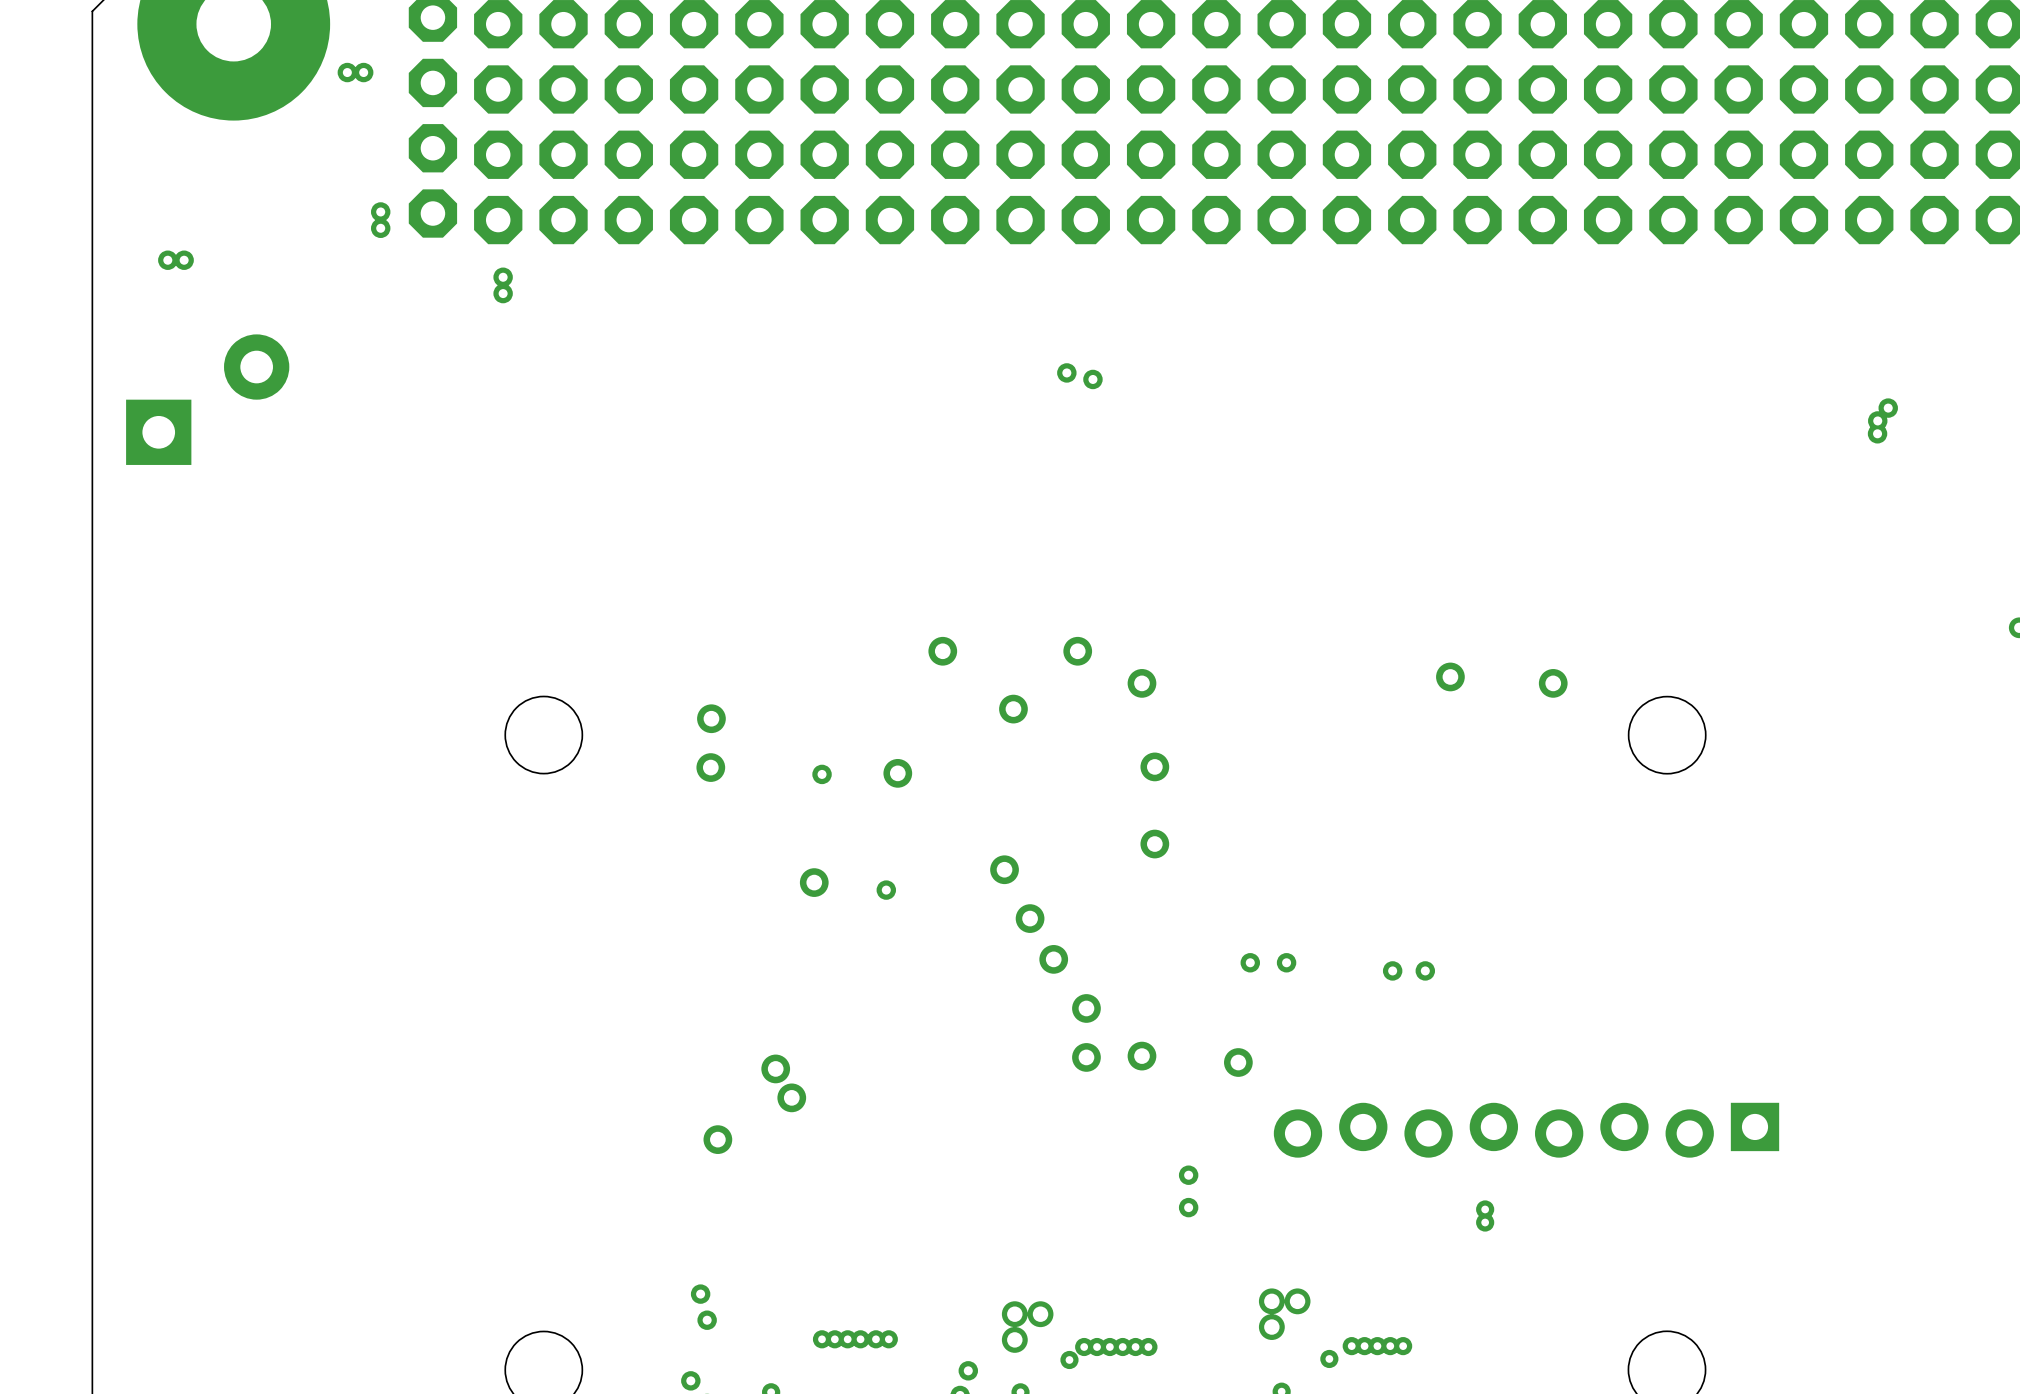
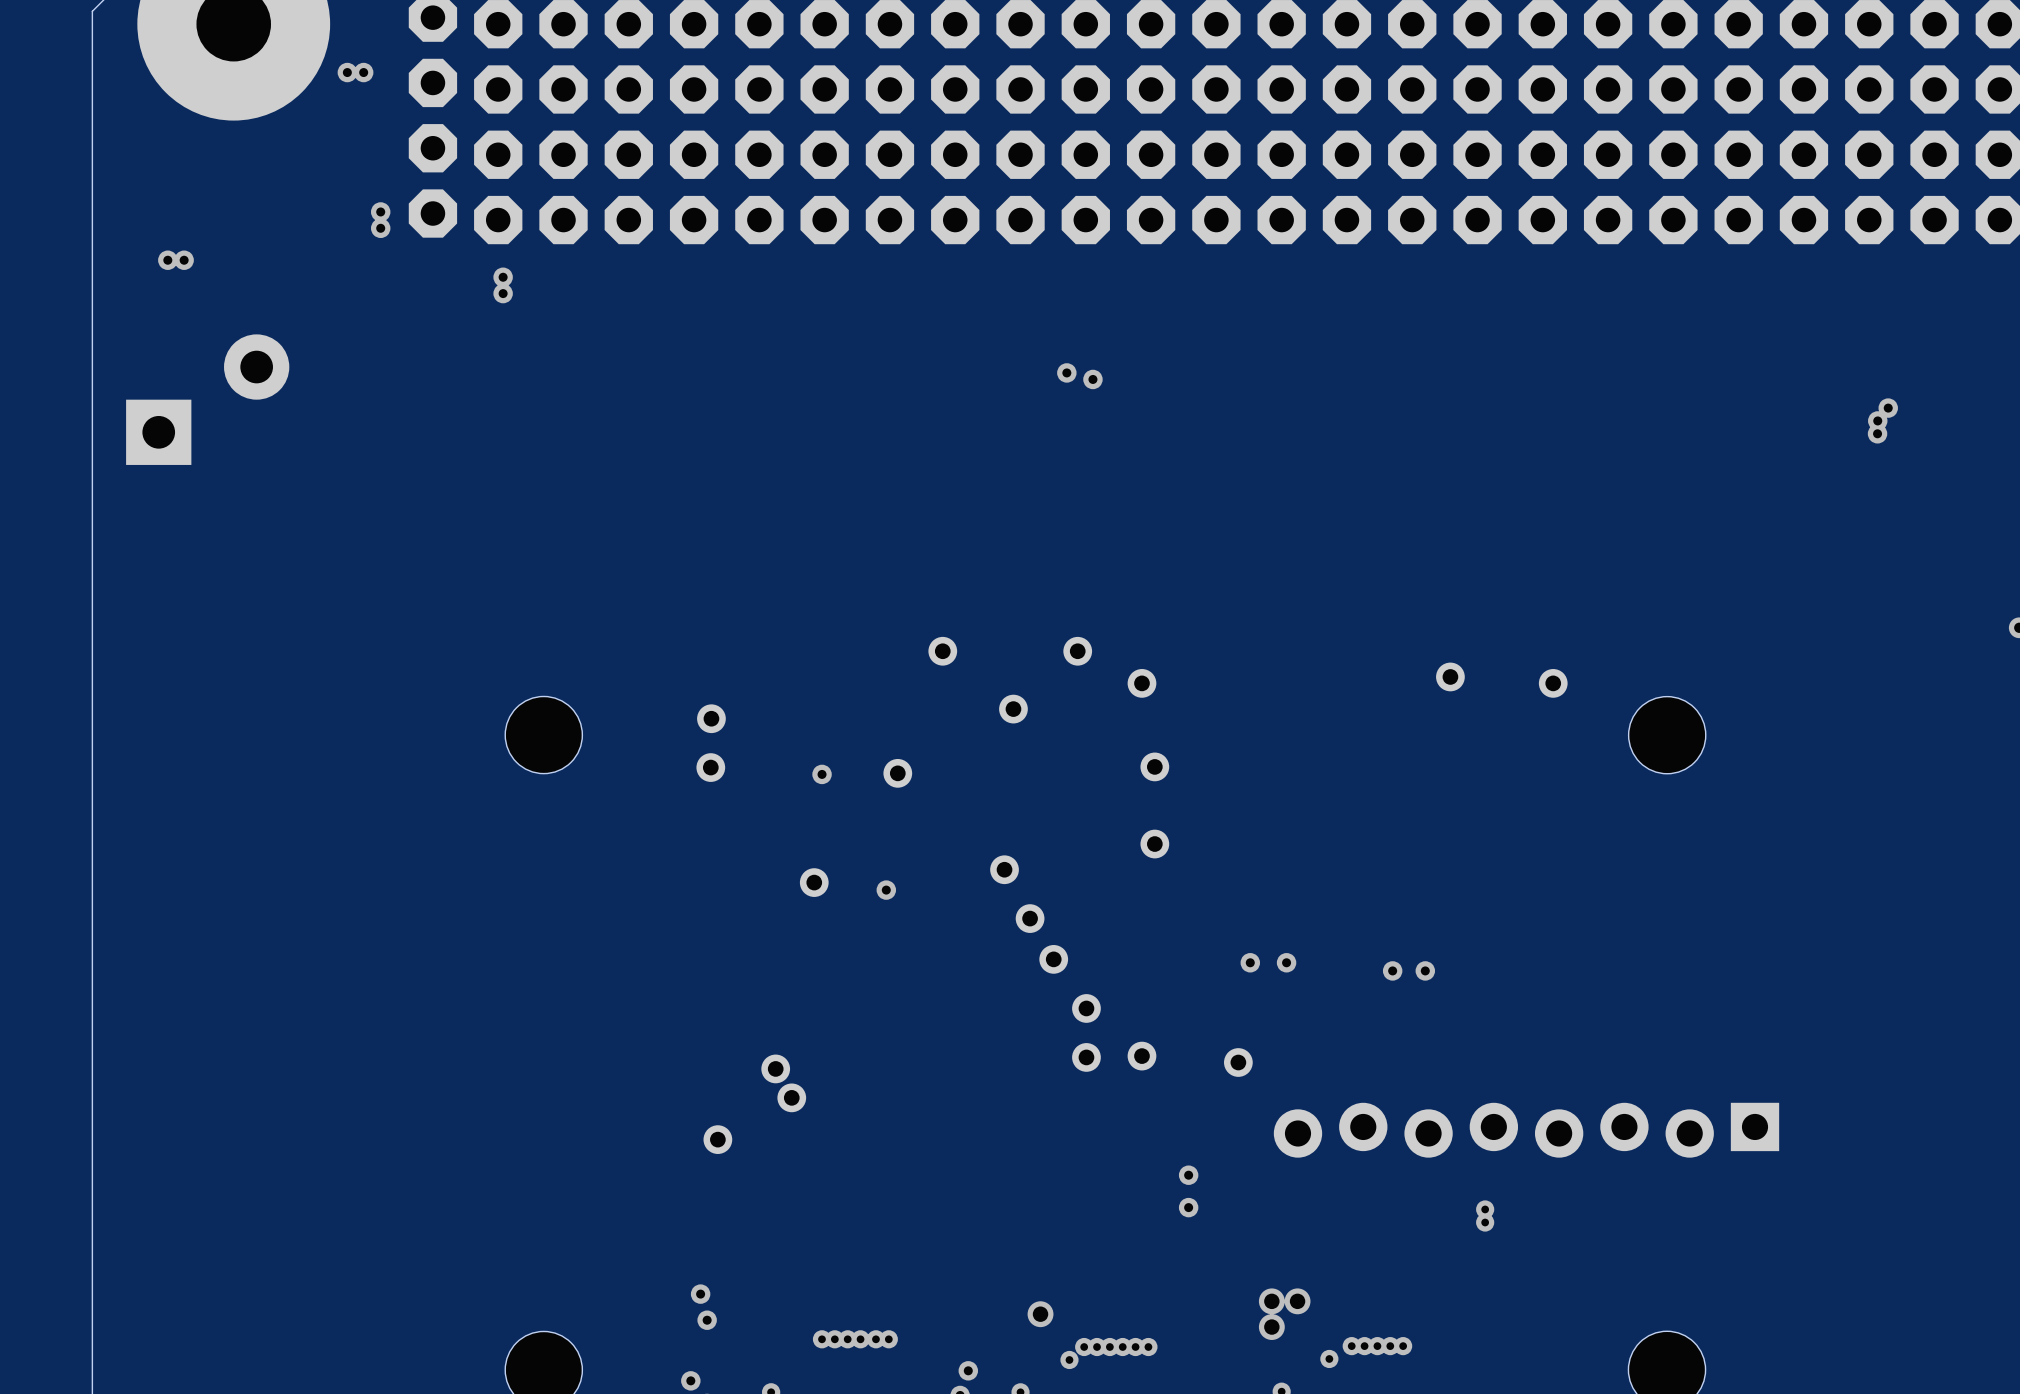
via: (1014, 1314) -> none
via: (1014, 1339) -> none

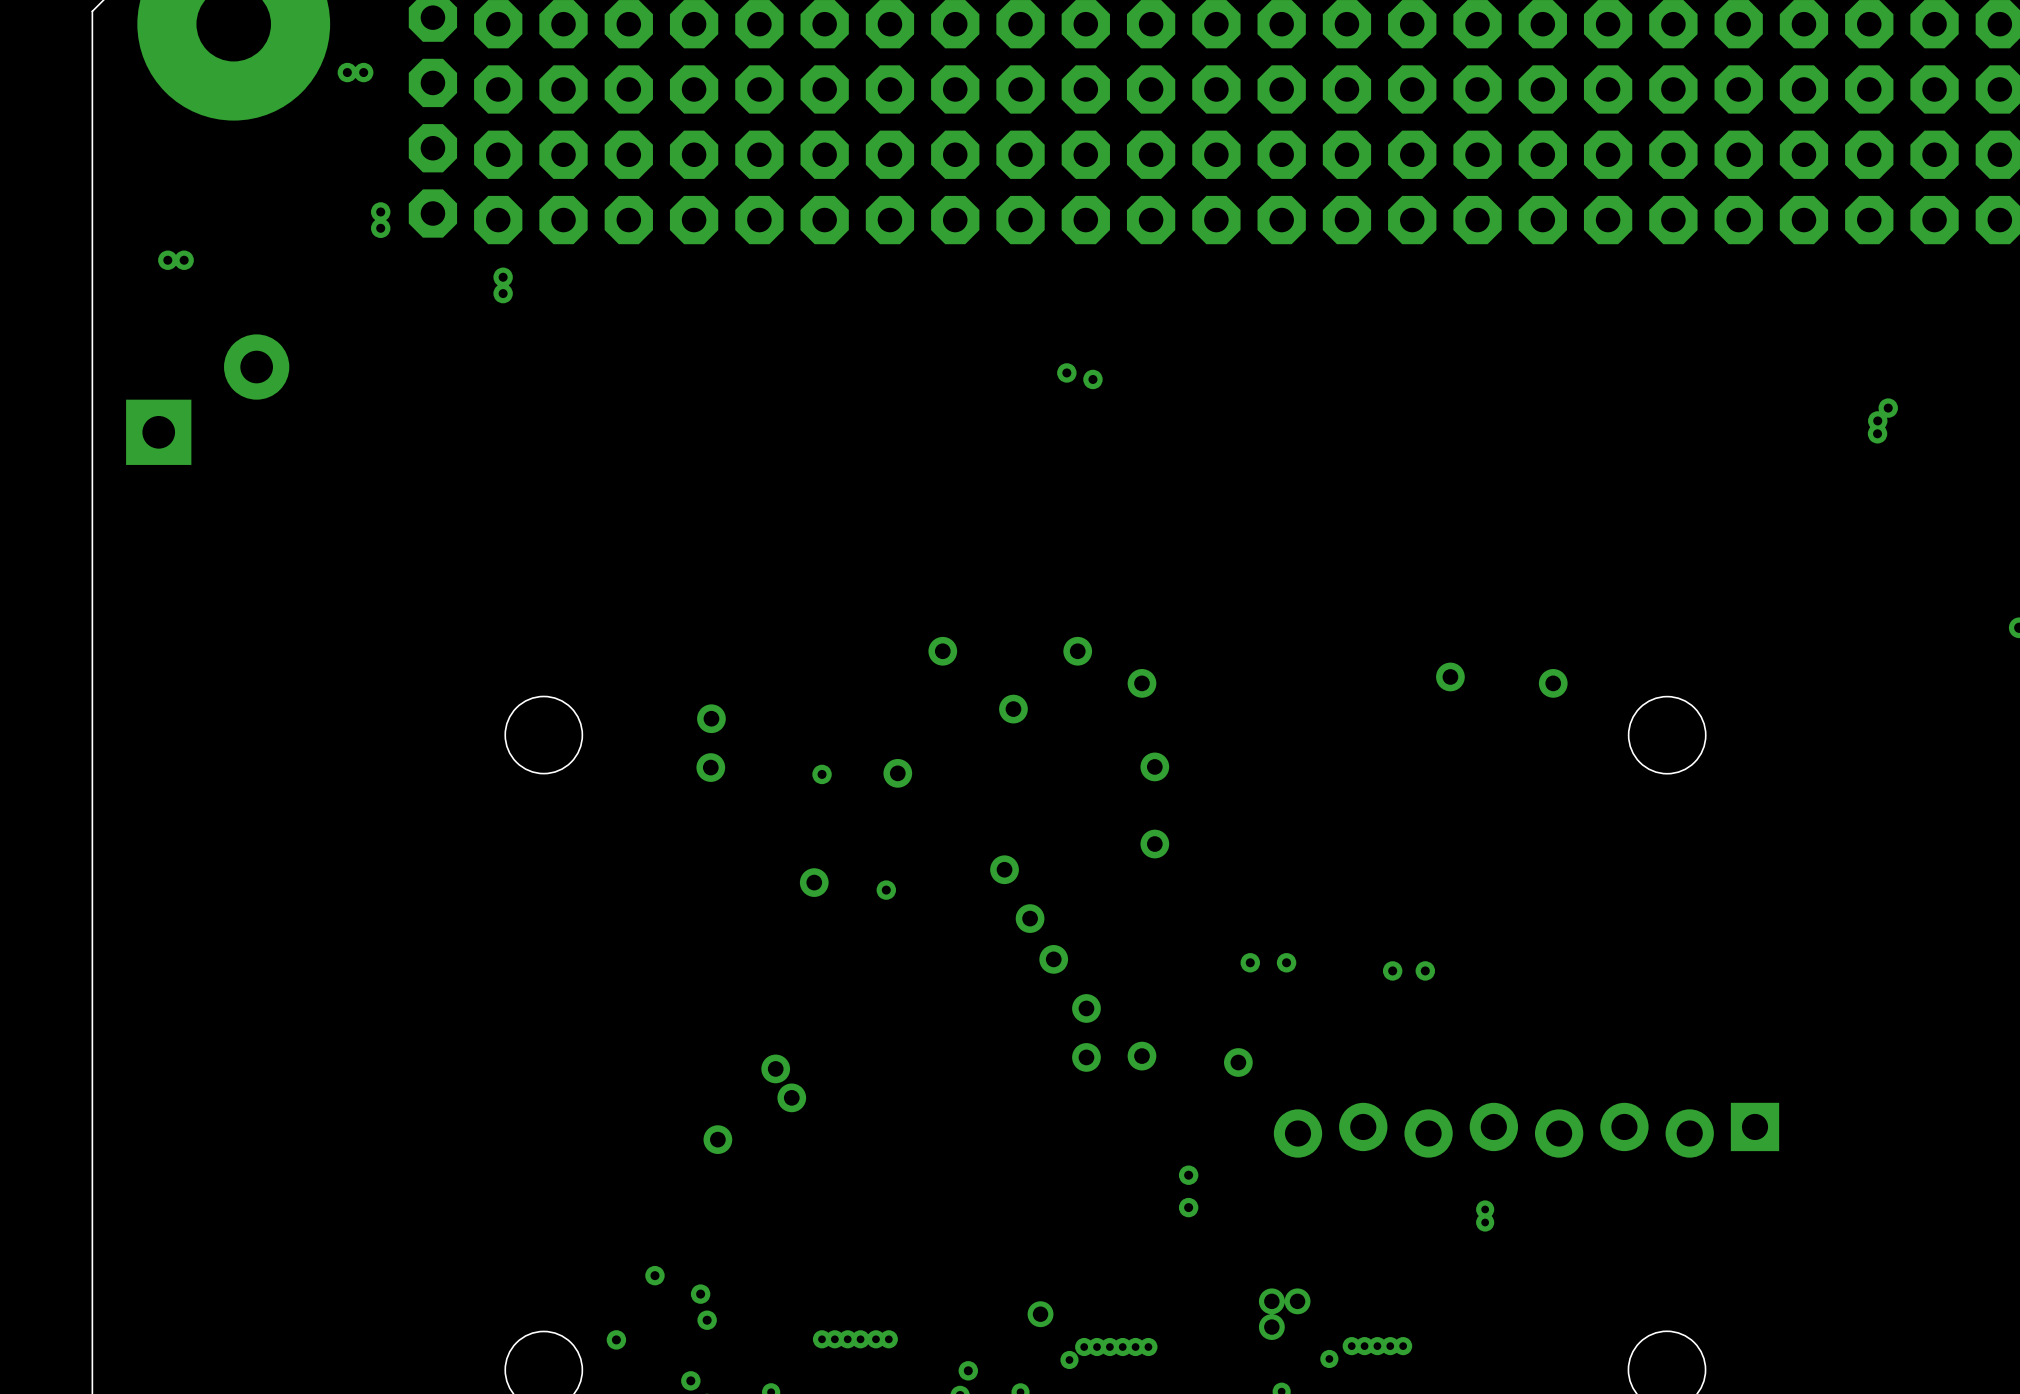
via: none -> (654, 1275)
via: none -> (616, 1339)

